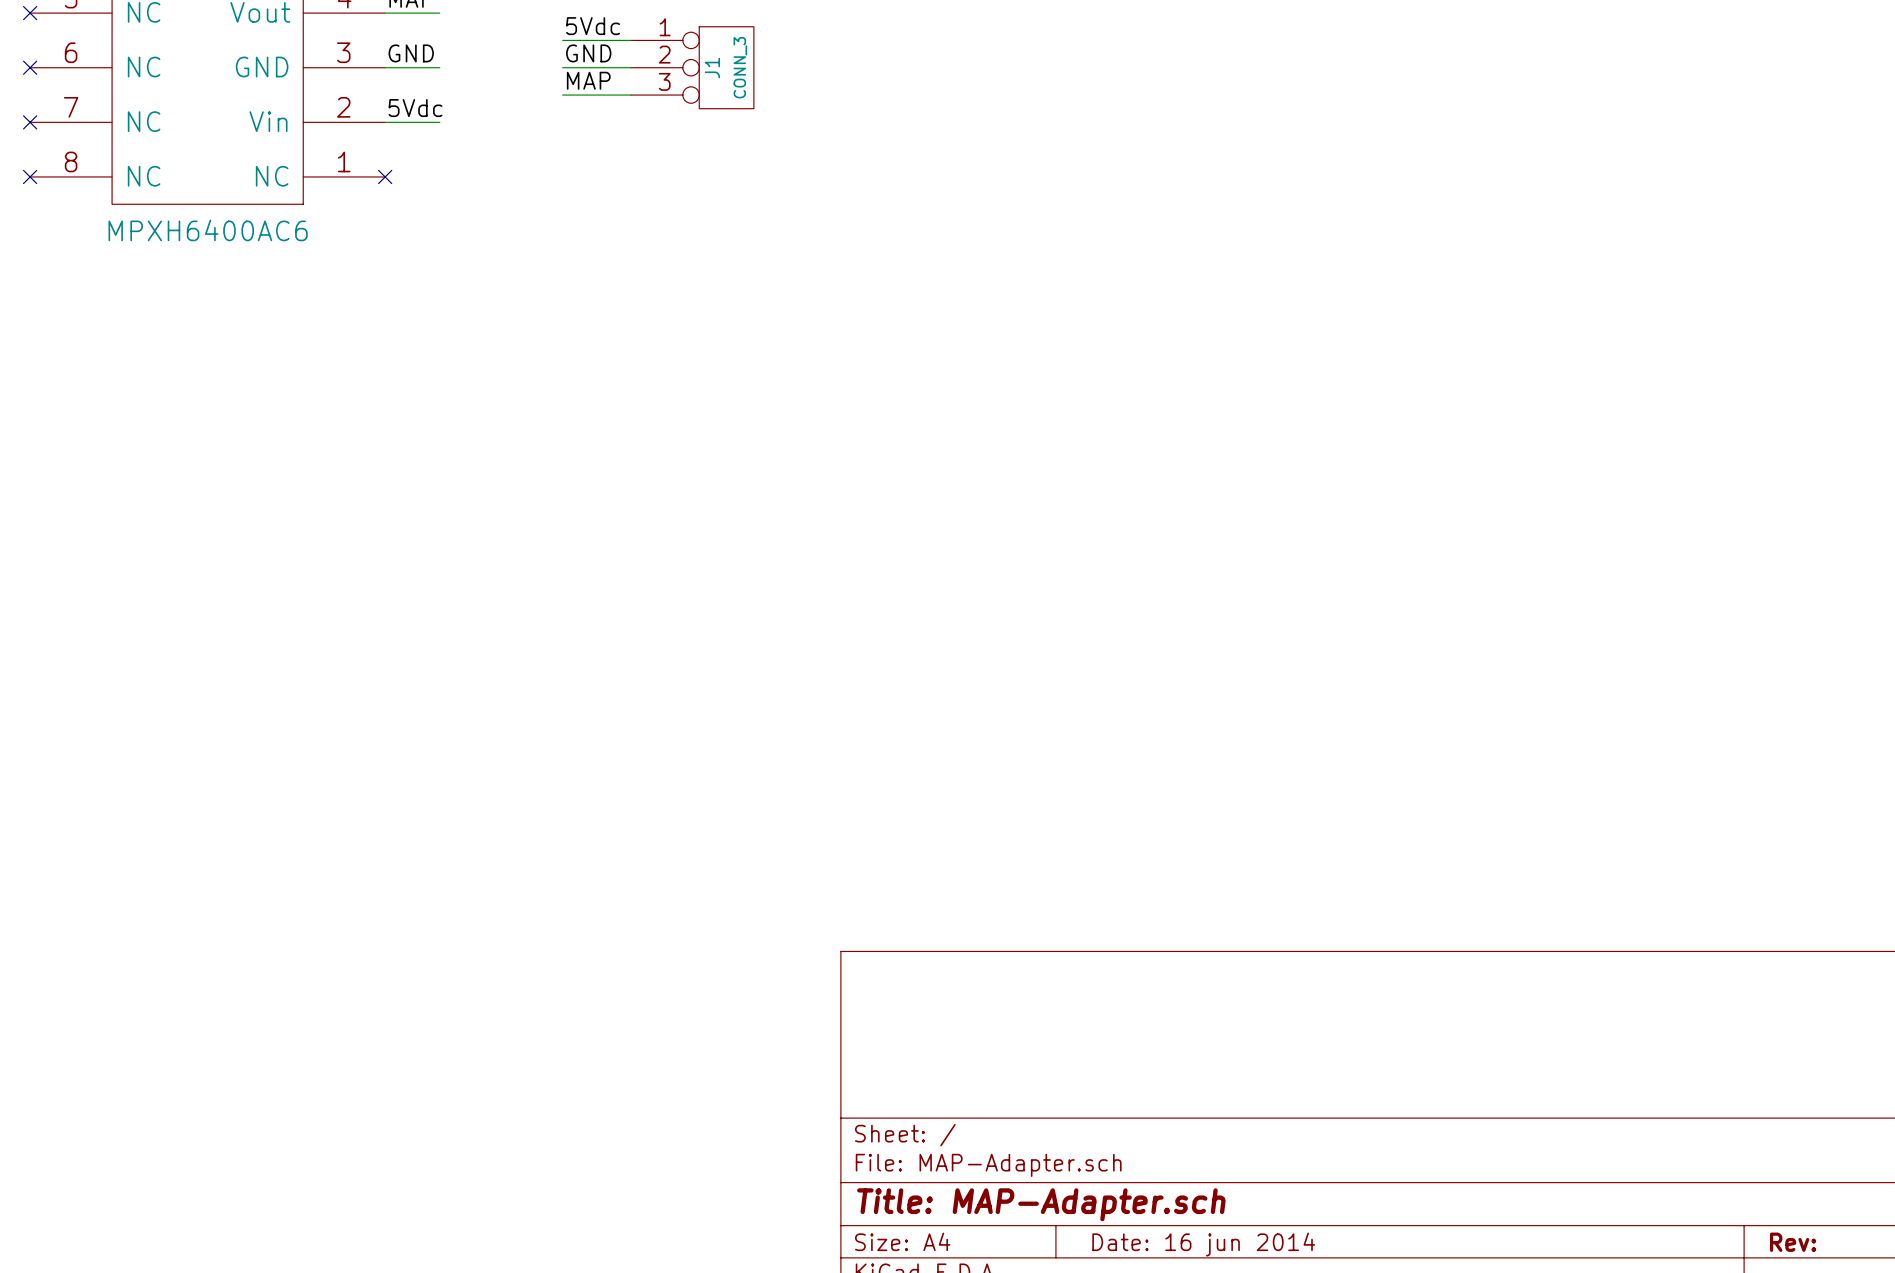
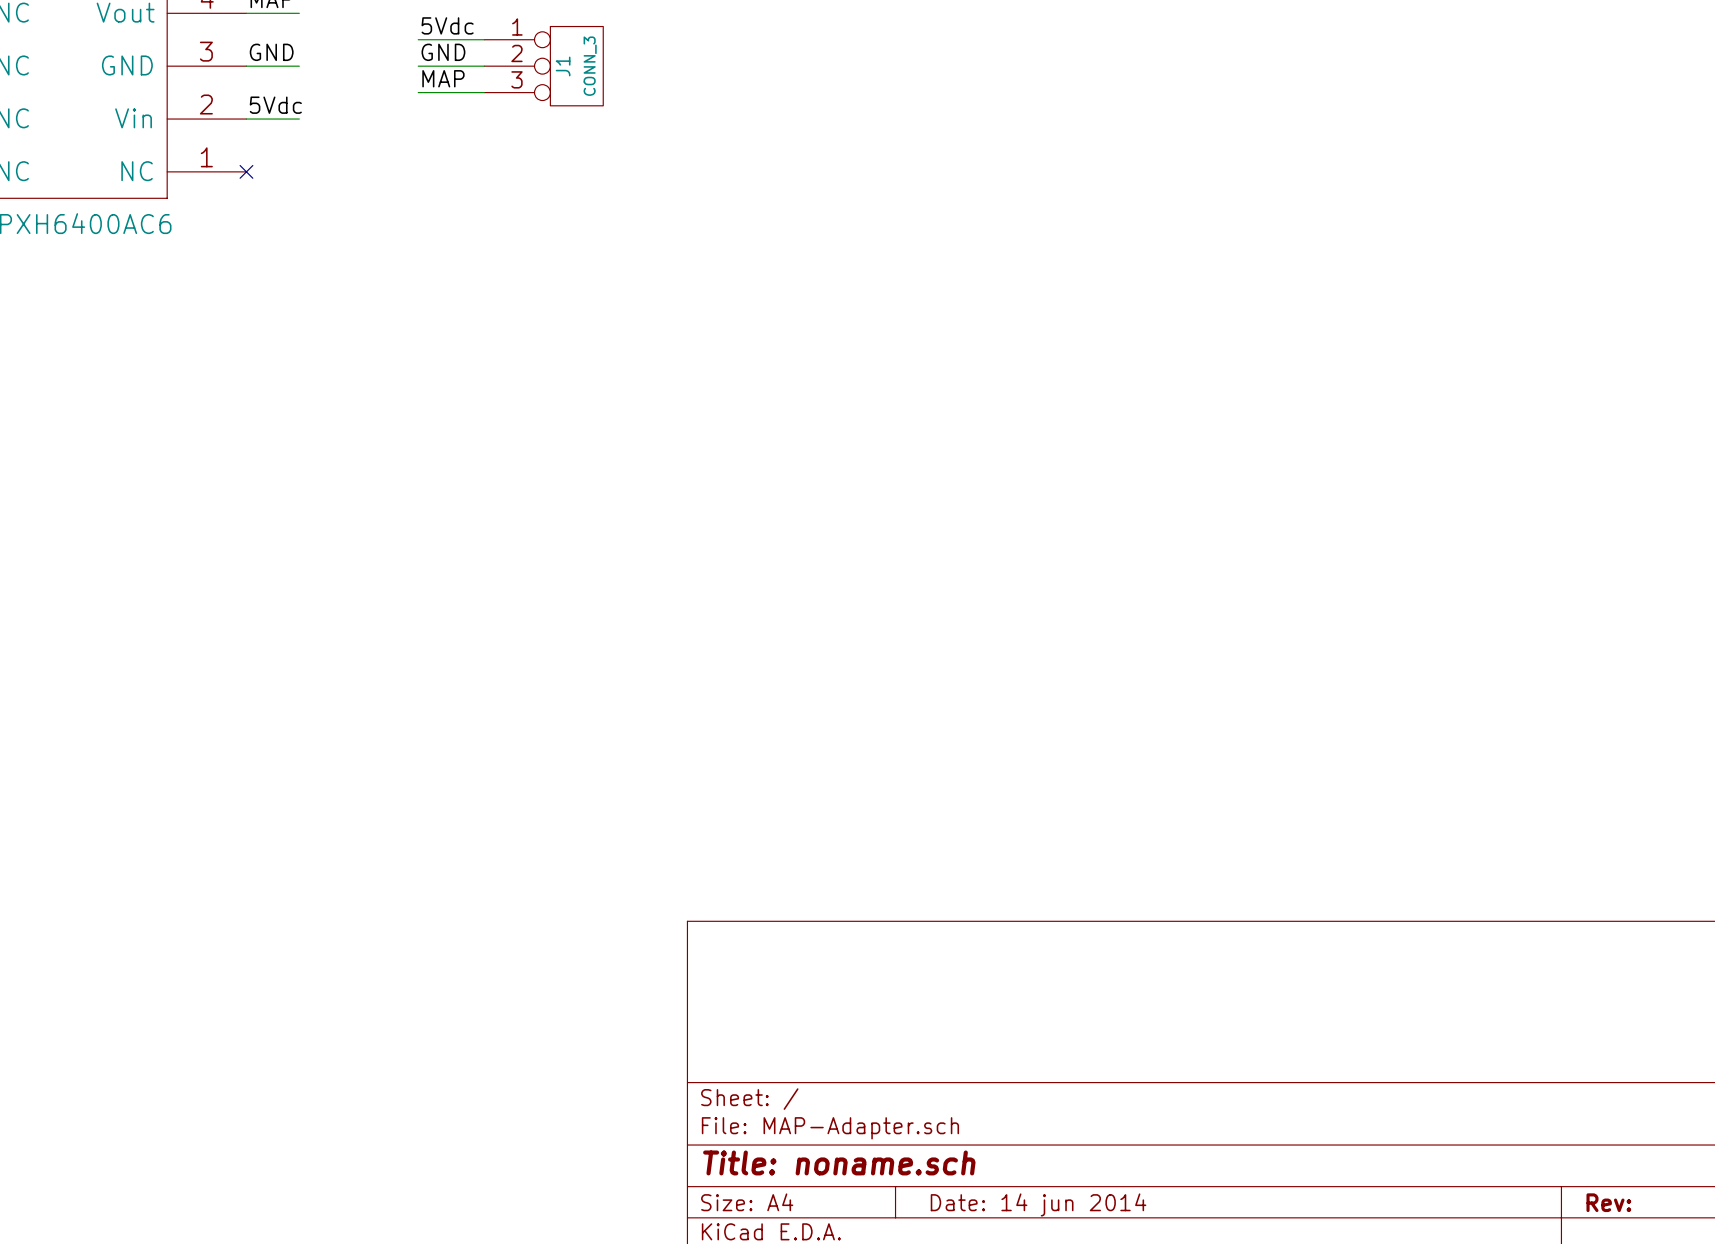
title block: Title: MAP-Adapter.sch (1041, 1204) -> Title: noname.sch (839, 1162)
title block: Date: 16 jun 2014 (1203, 1244) -> Date: 14 jun 2014 (1038, 1204)

